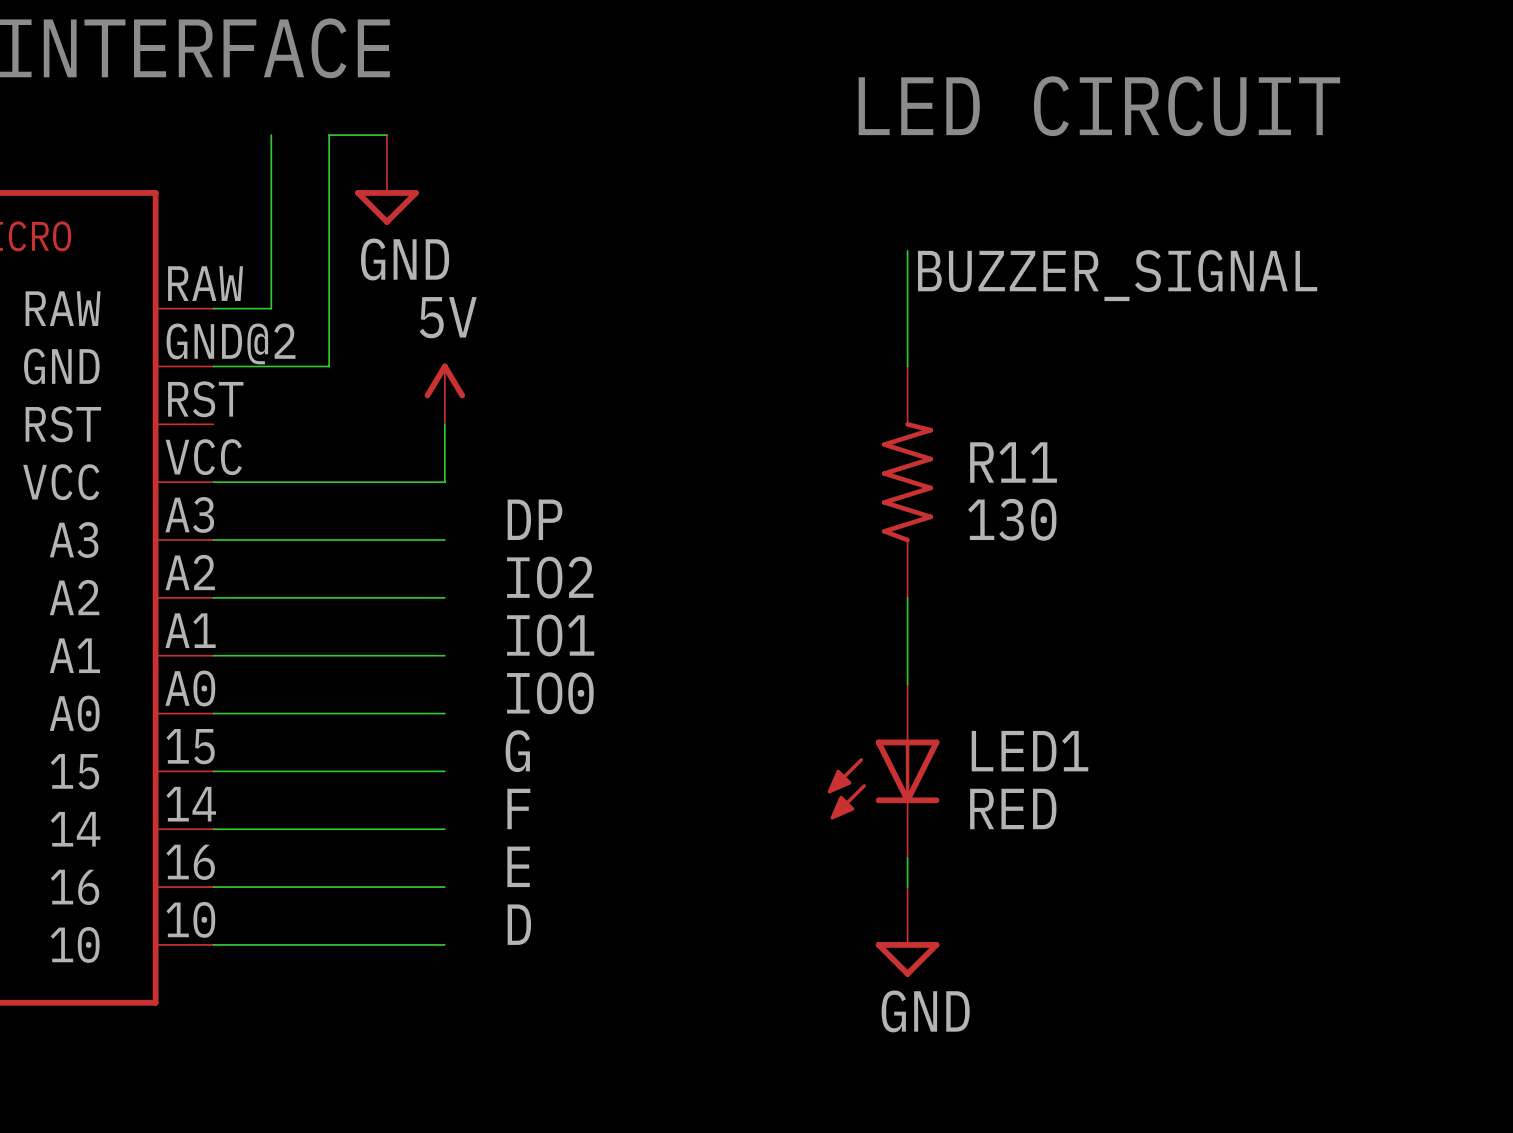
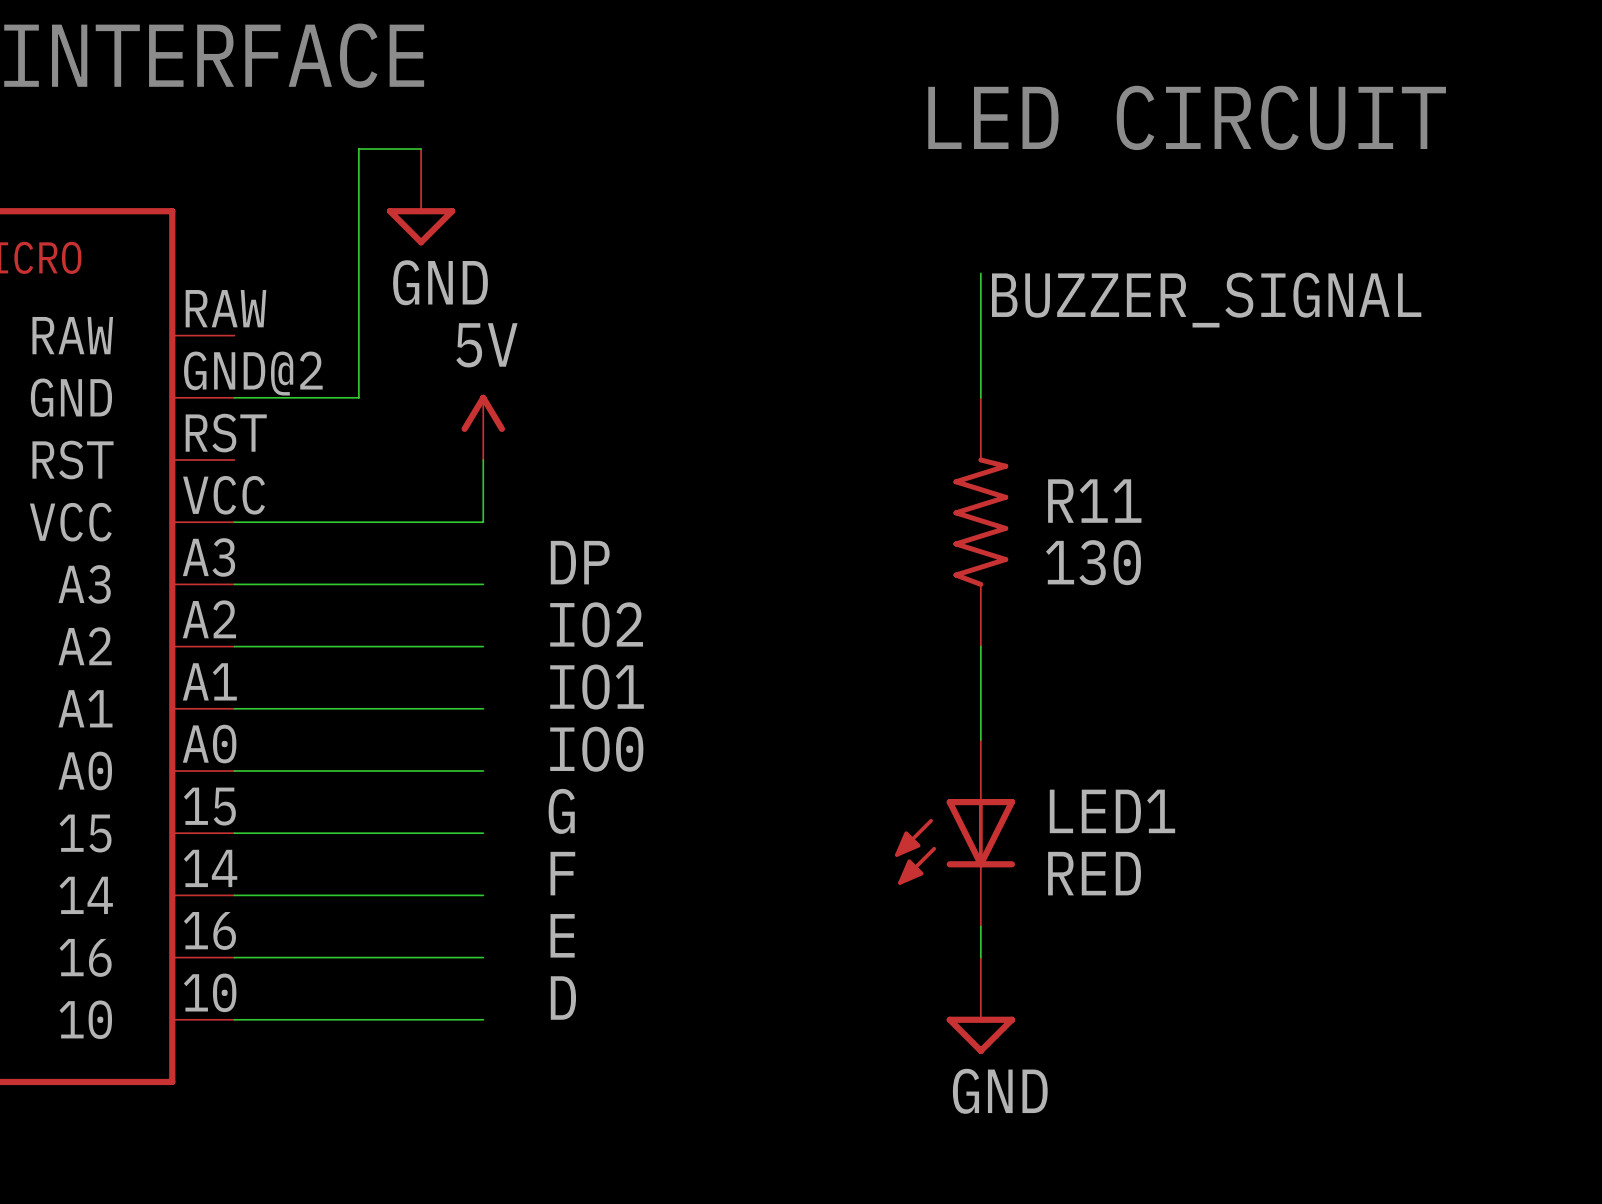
wire: (271, 135) (271, 308) (213, 308) -> none

